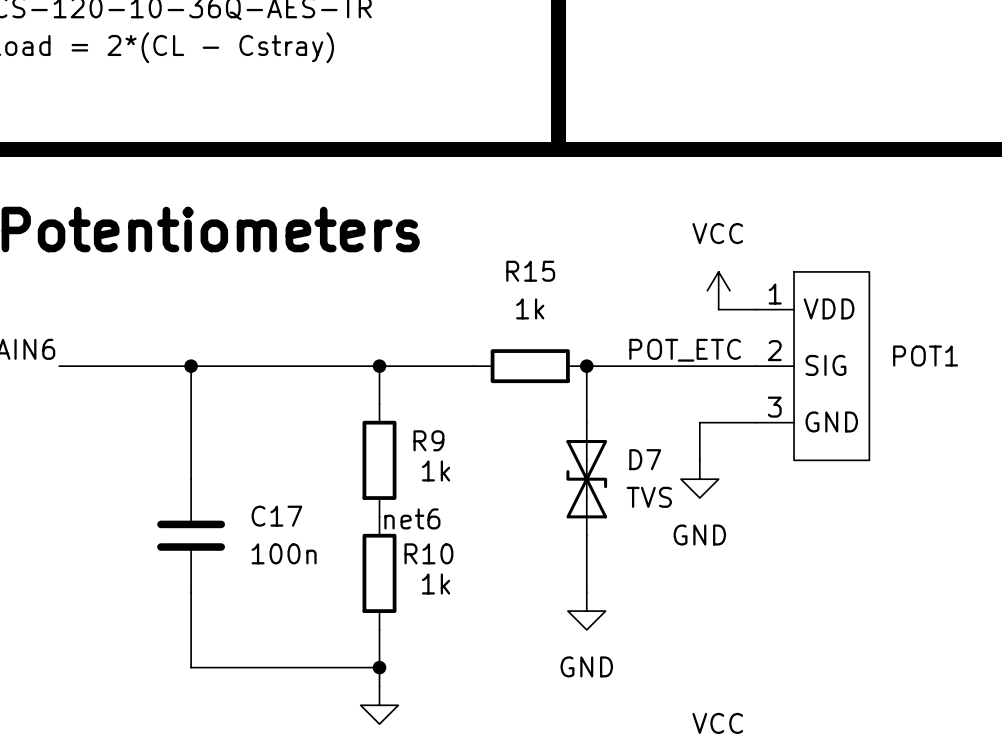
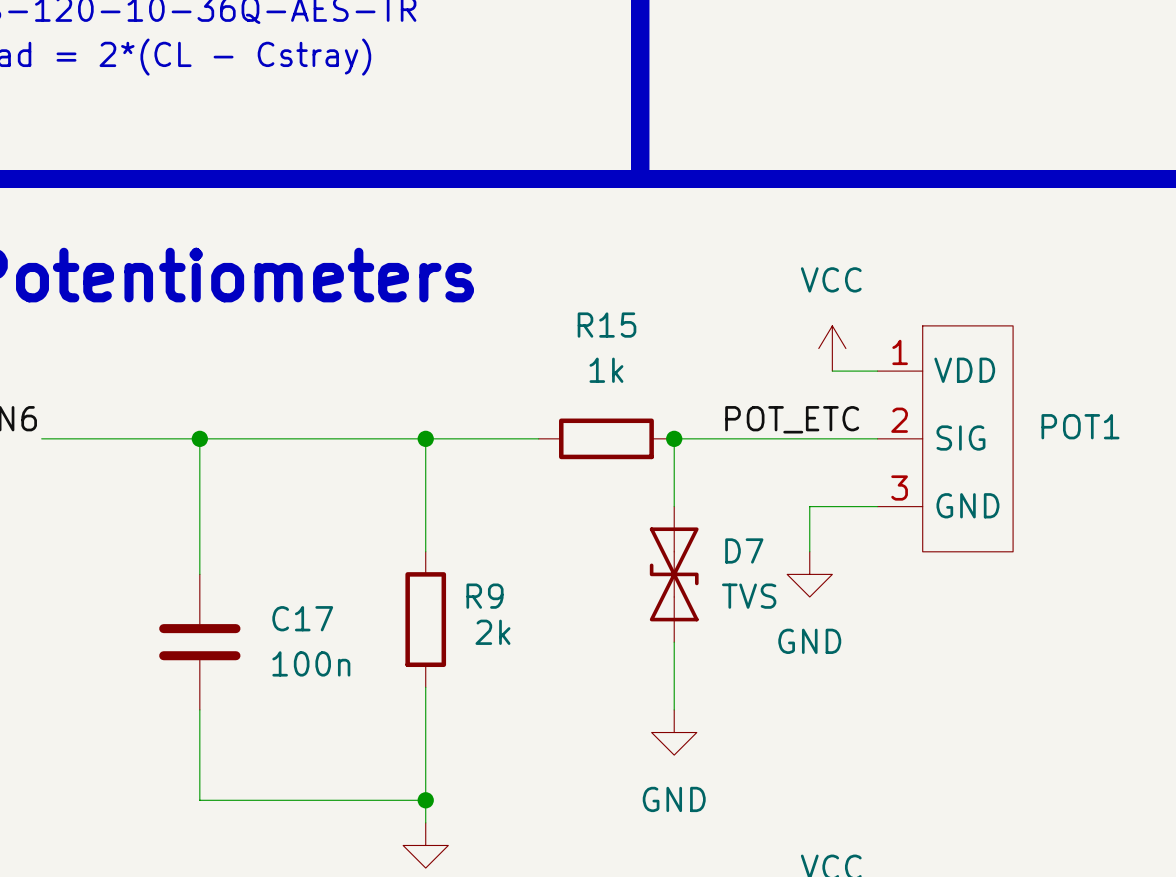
wire: none -> (425, 484) (425, 551)
R9 position: (379, 460) -> (425, 619)
R9 value: 1k (436, 470) -> 2k (492, 632)
label: net6 (412, 518) -> none
wire: none -> (425, 687) (425, 755)
R10: 1k (379, 573) -> none

